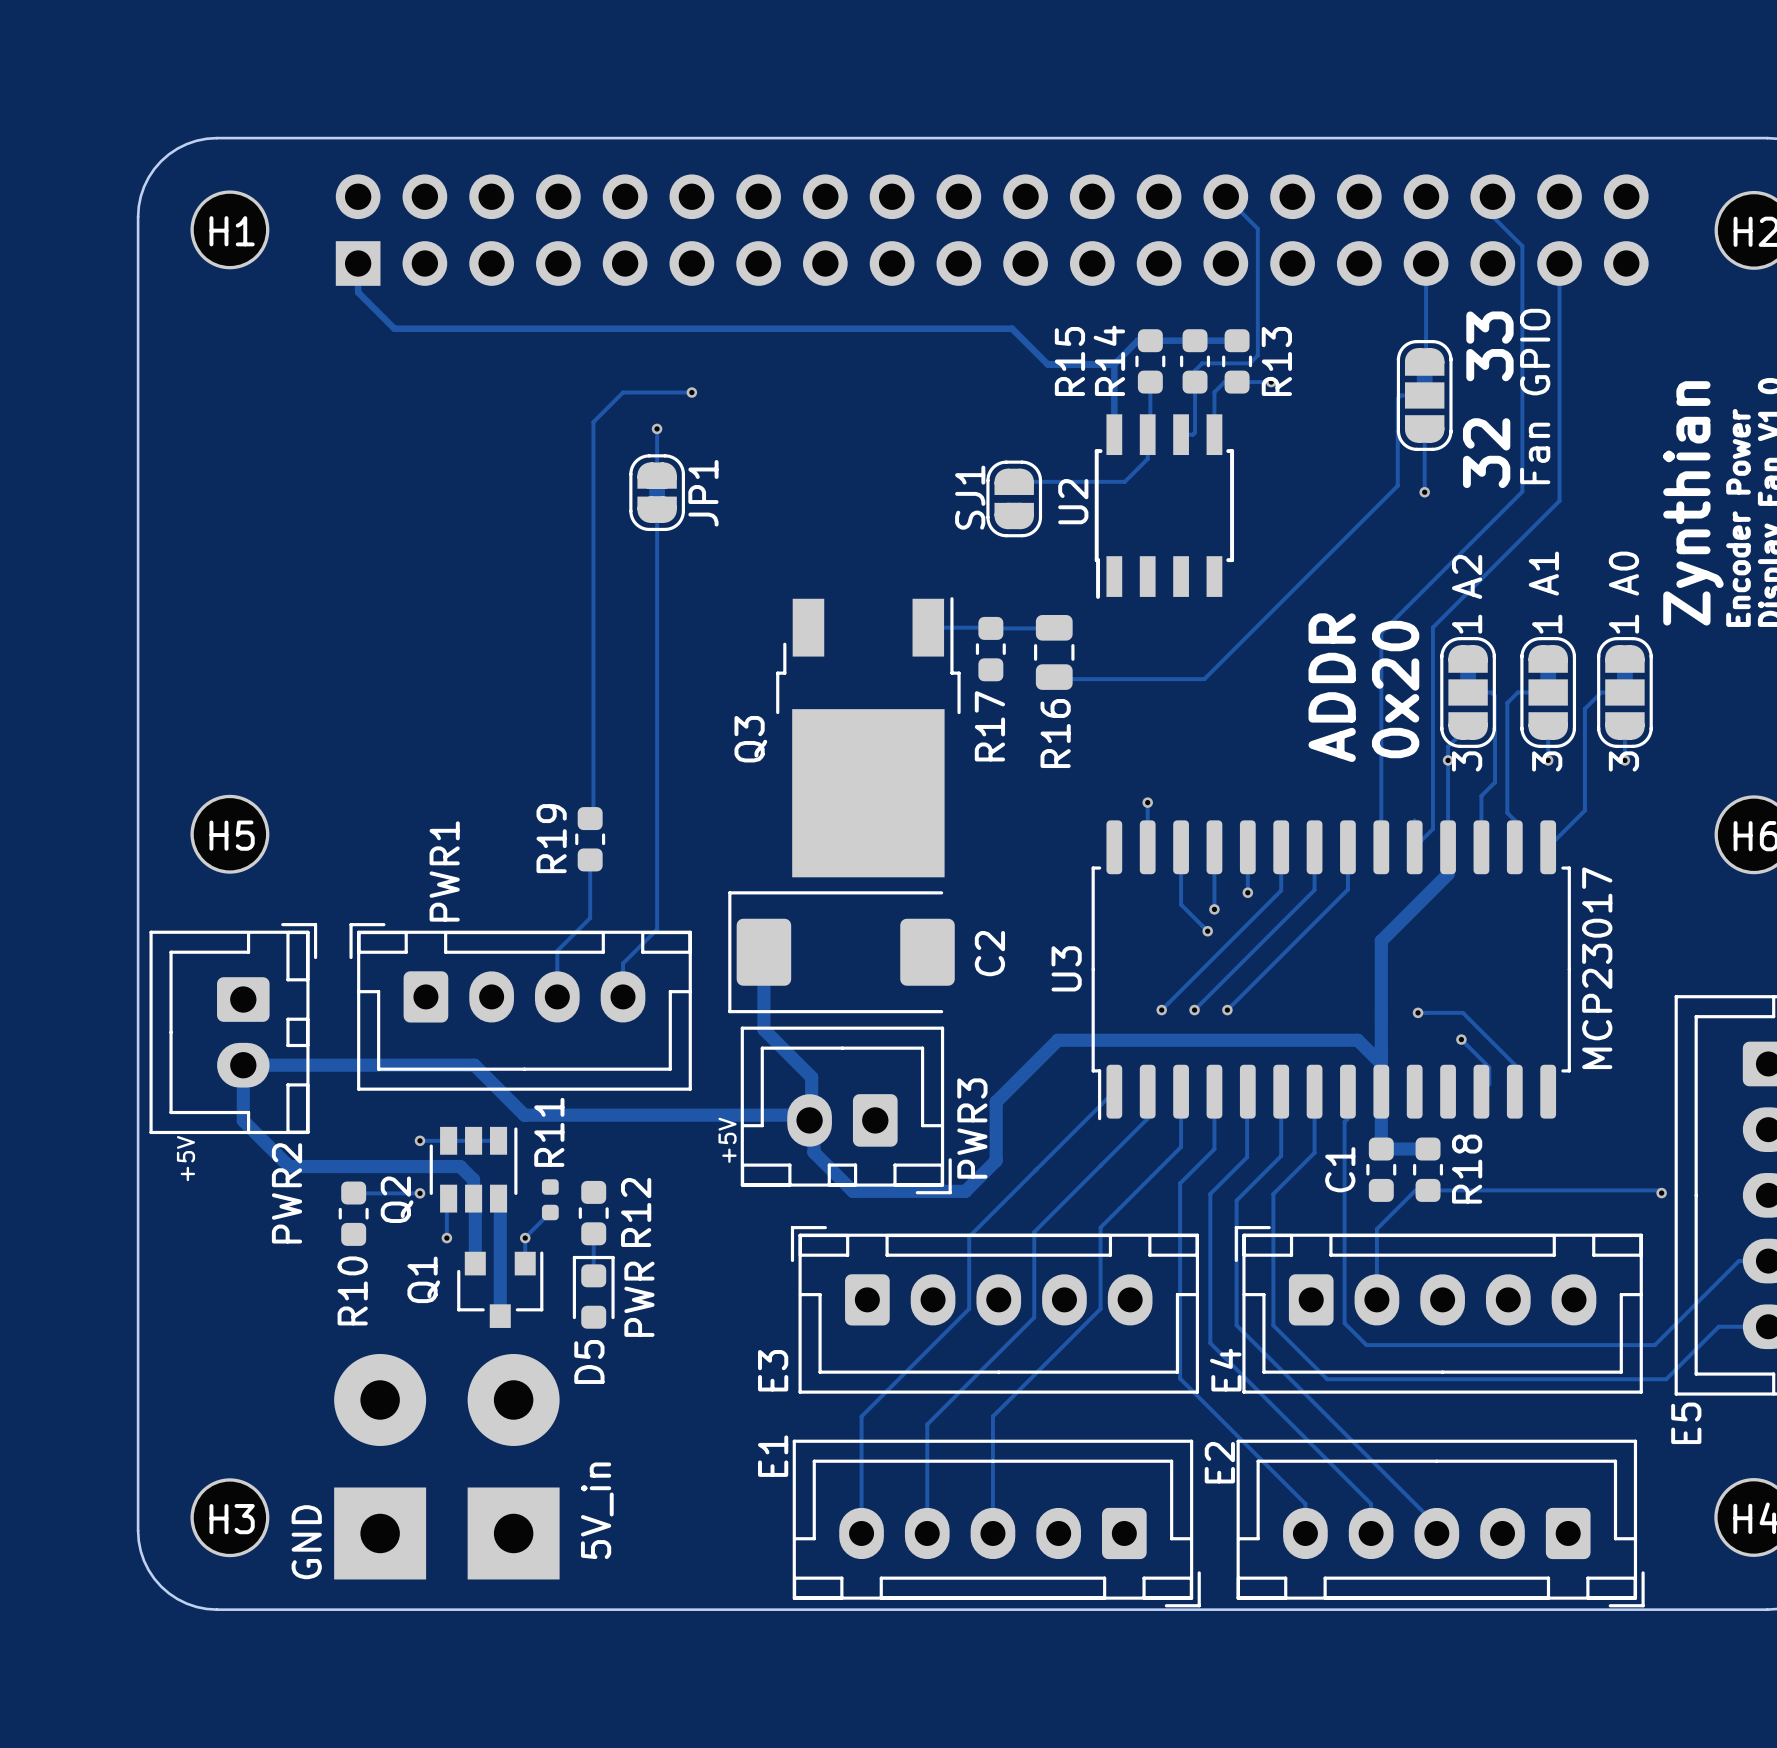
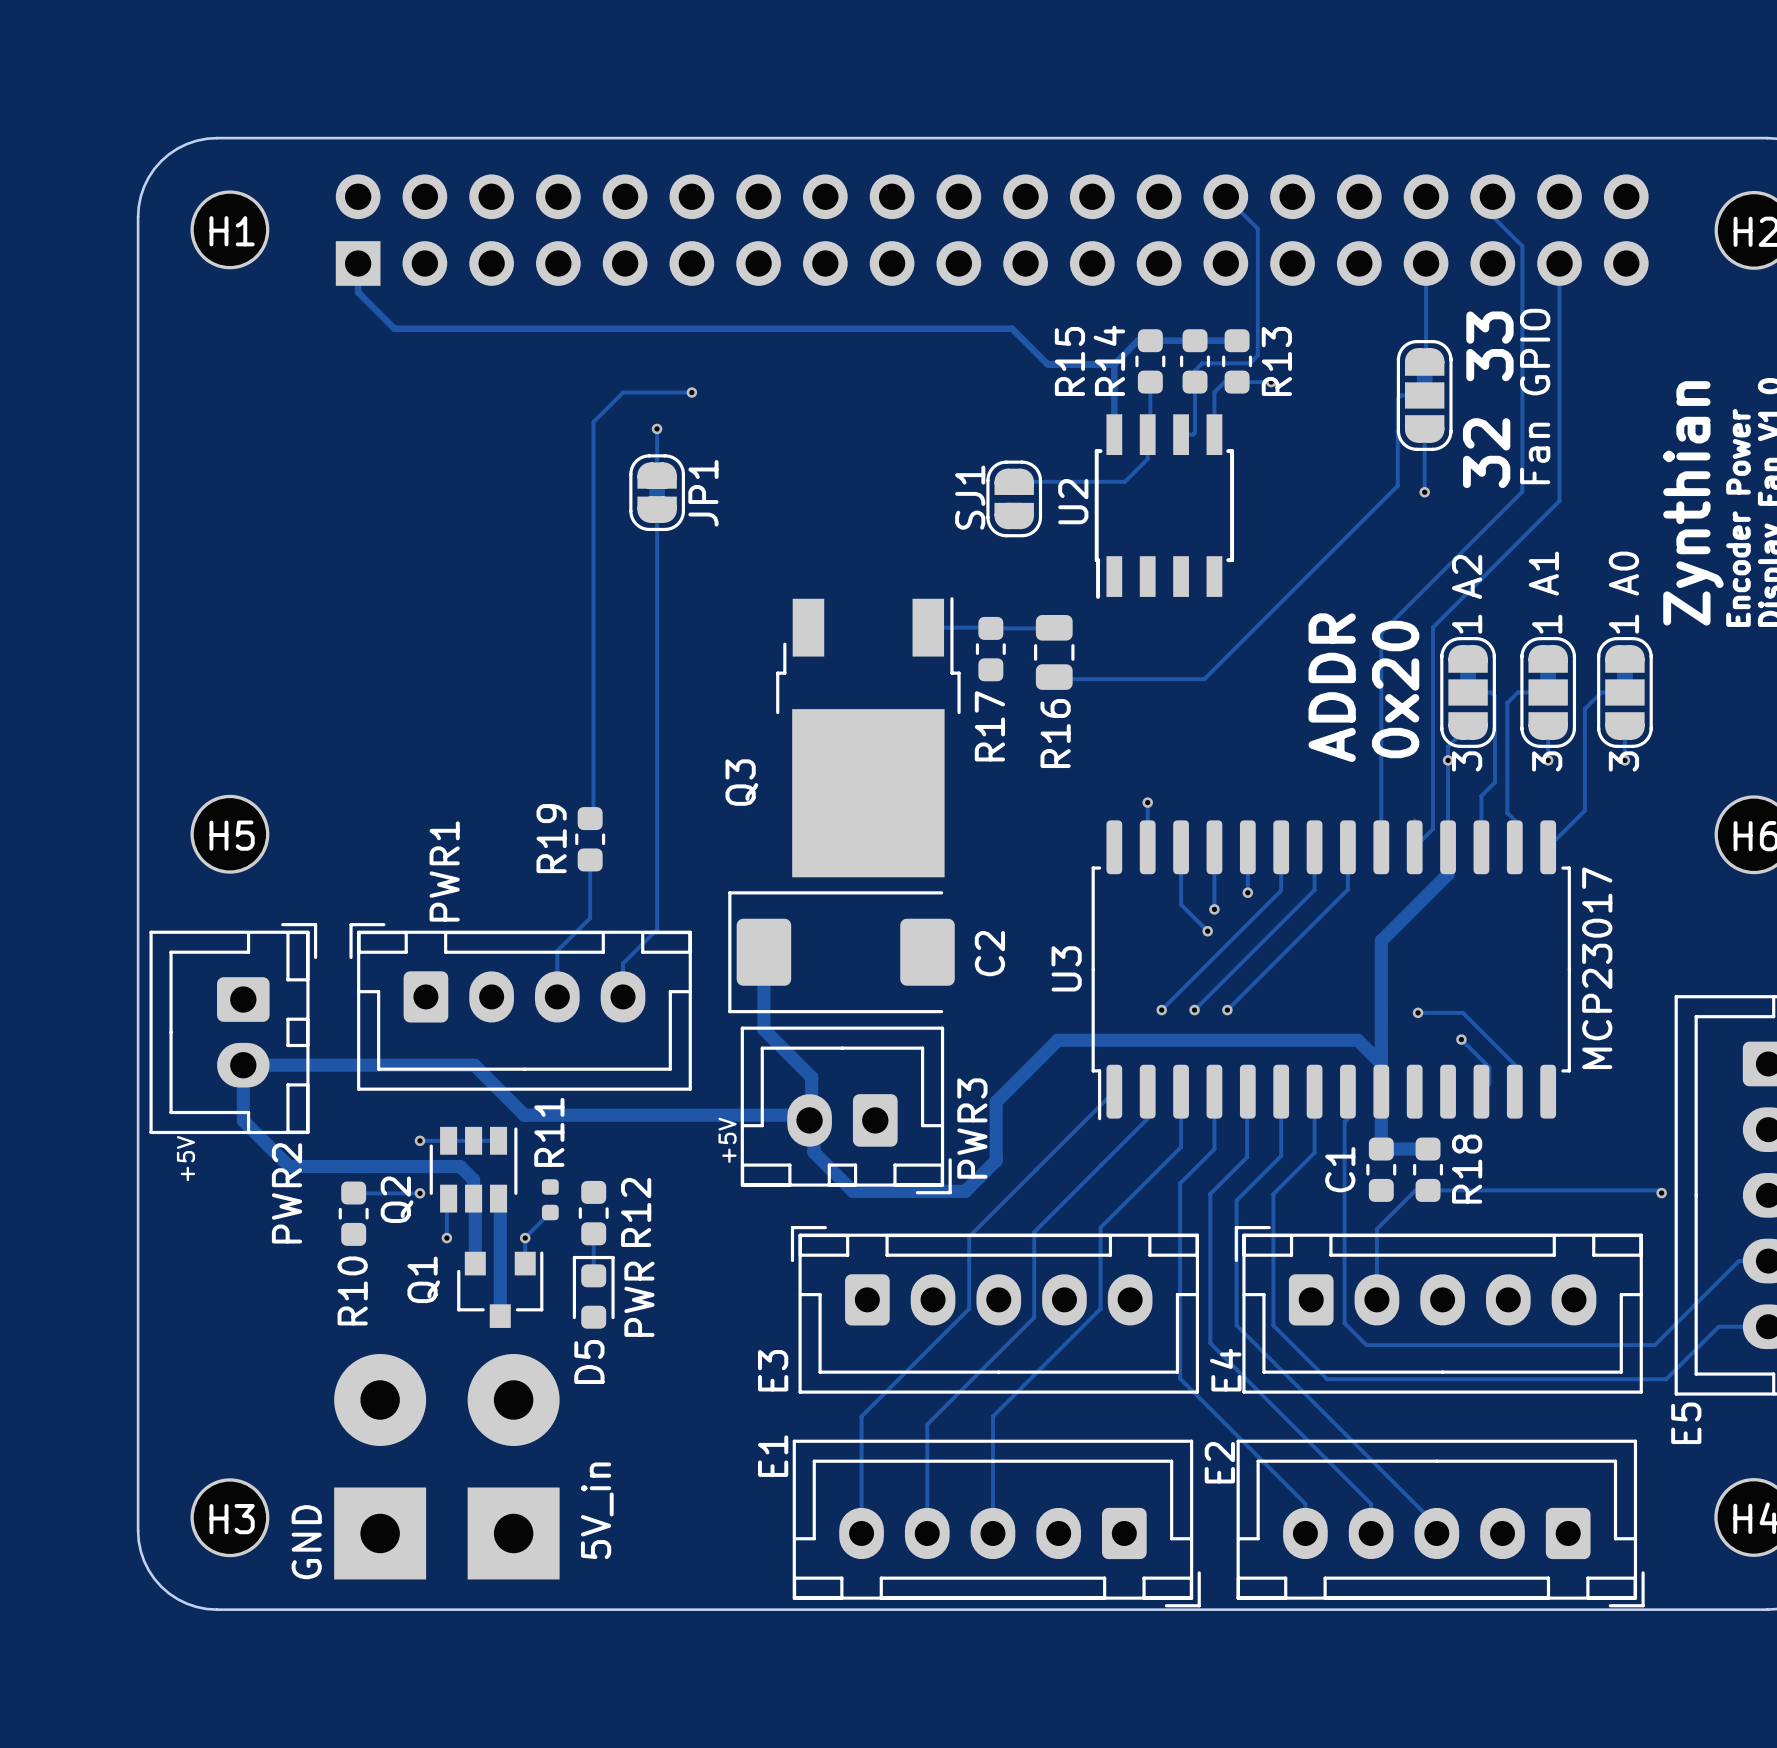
Q3 name position: Q3 (750, 739) -> Q3 (741, 782)

